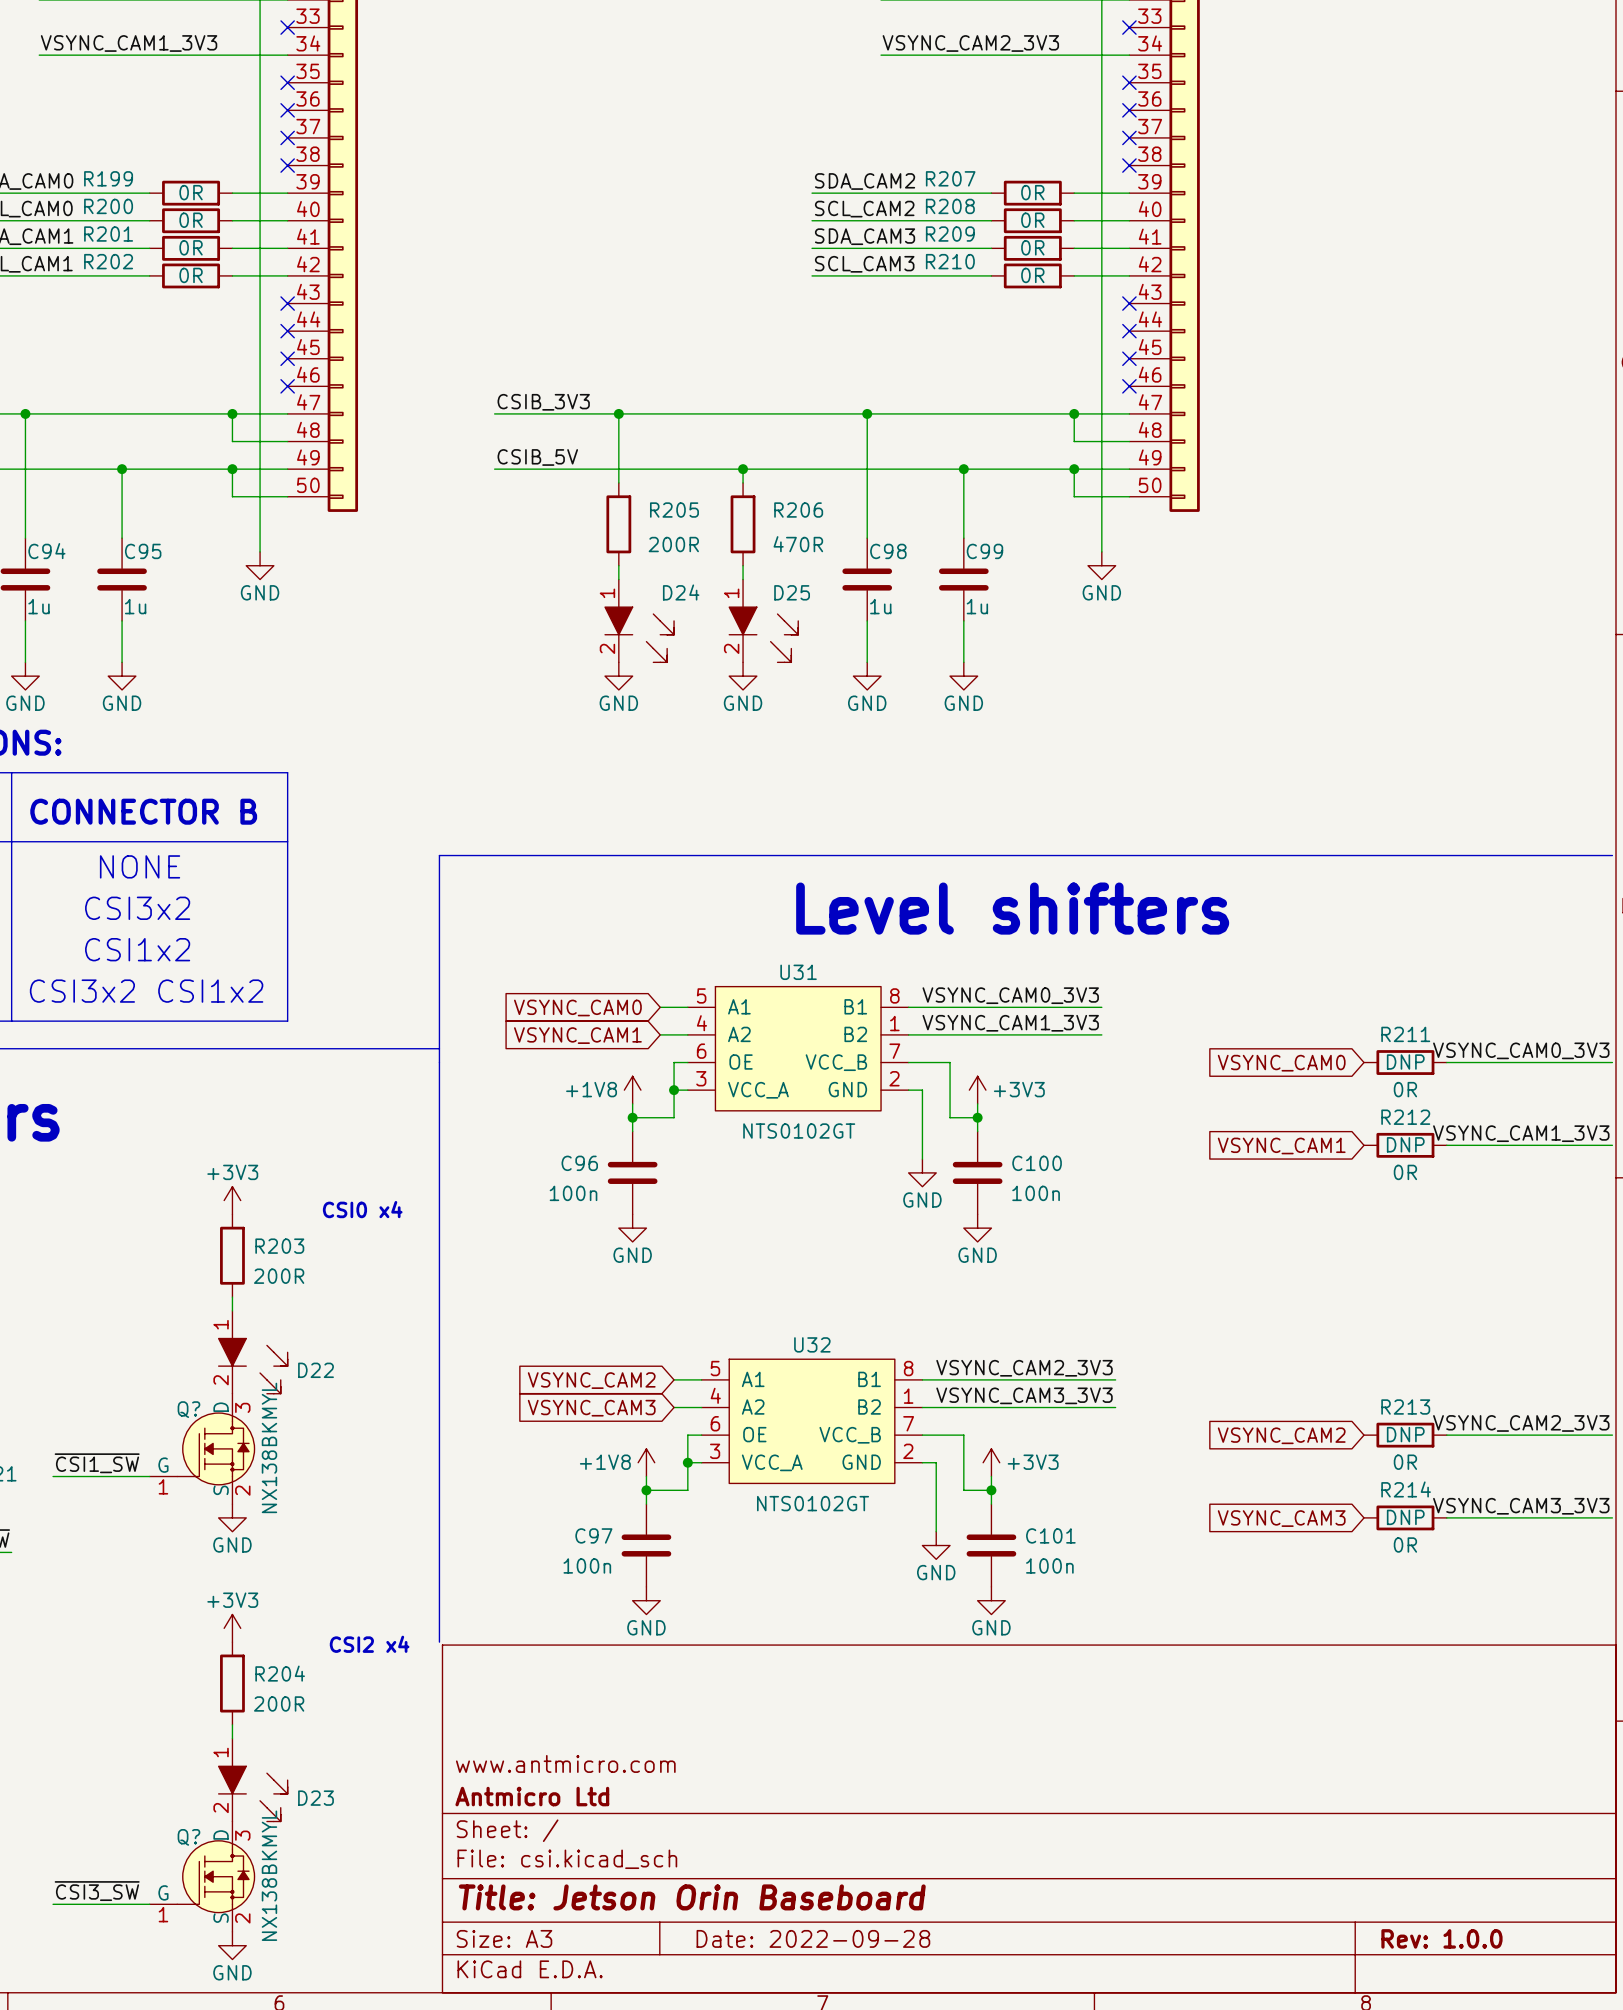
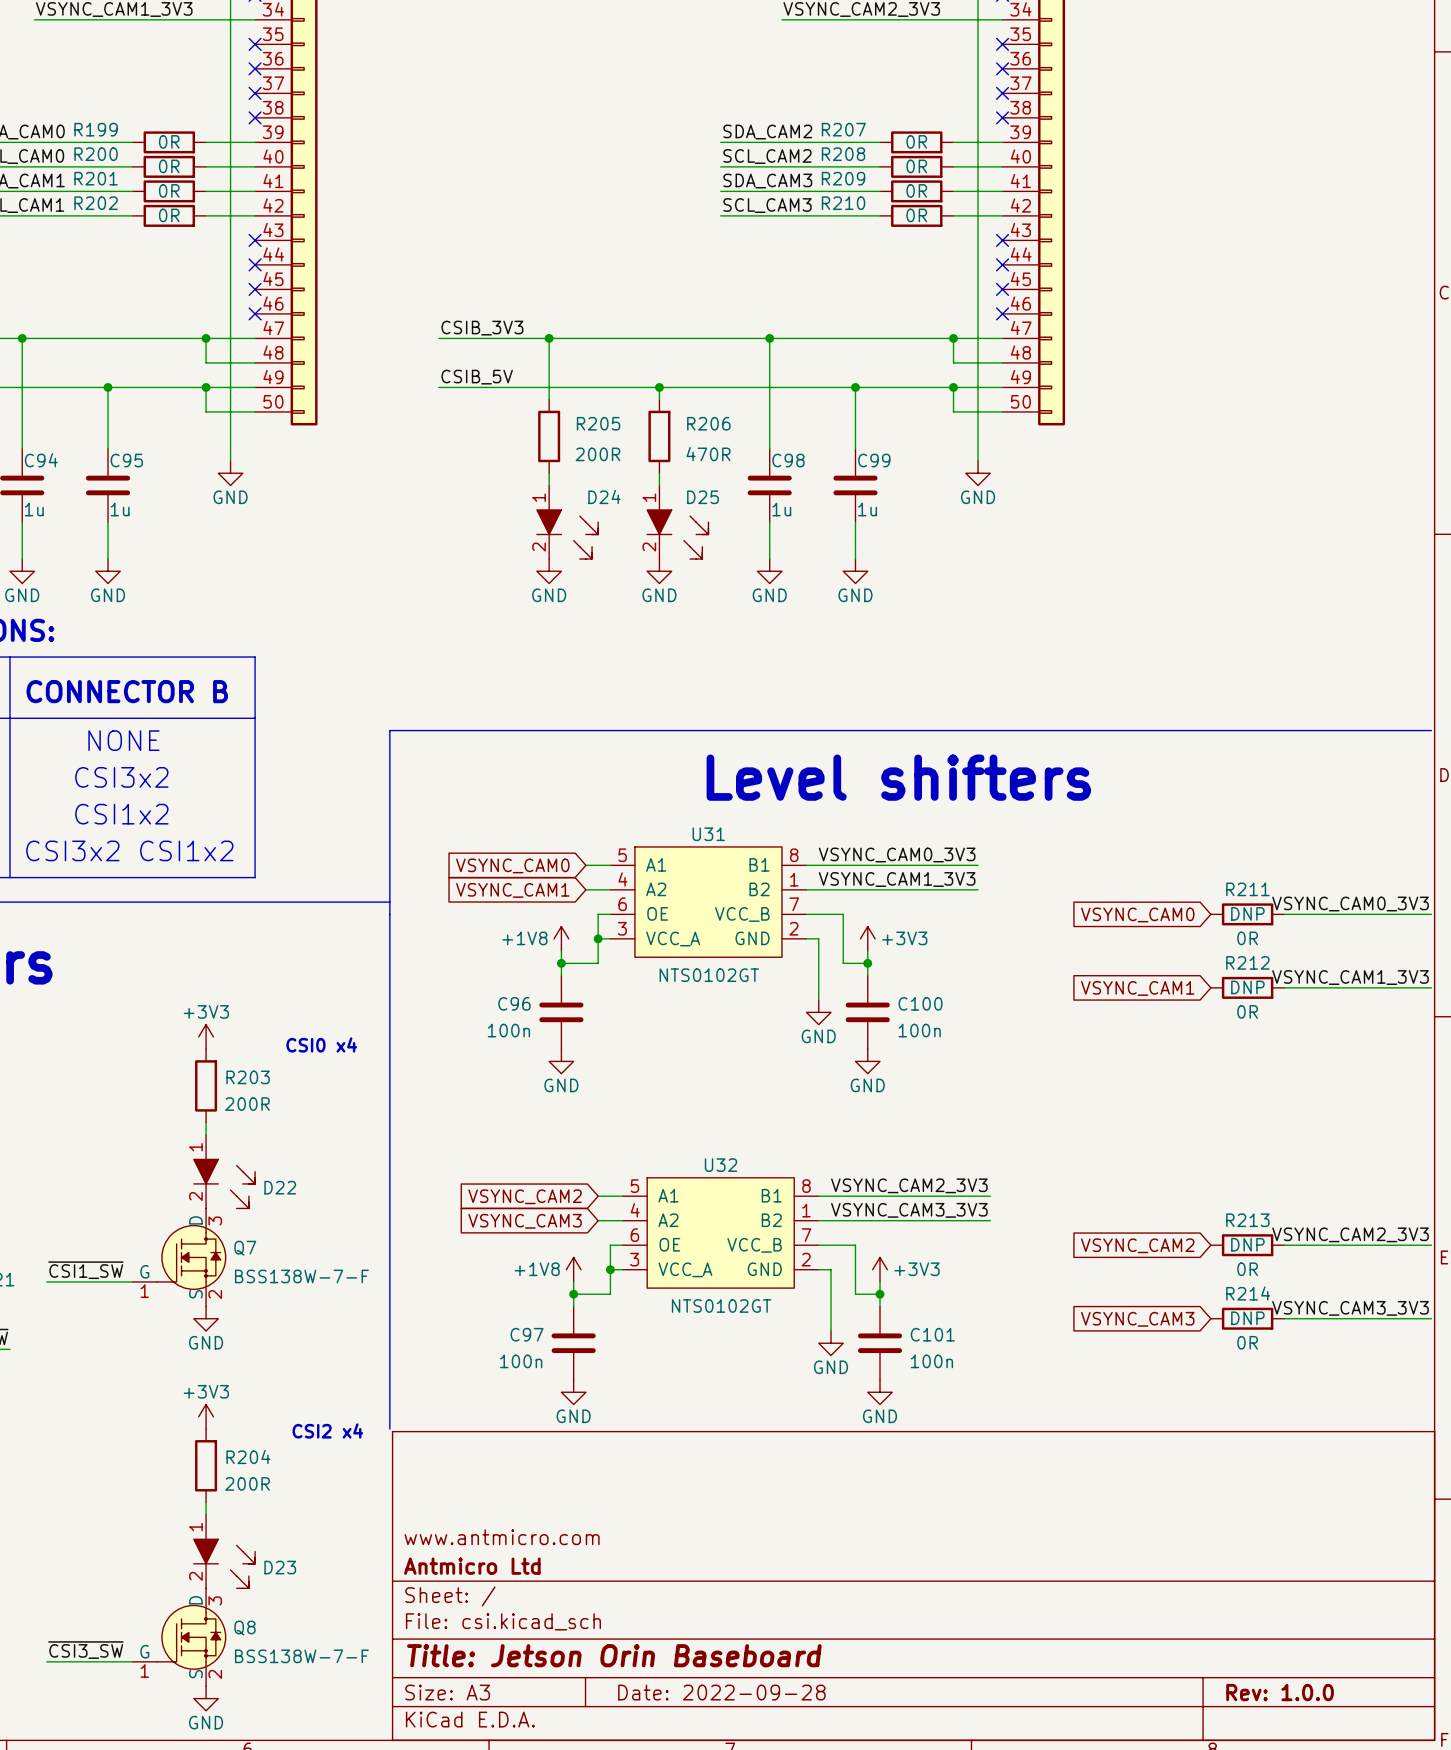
Q? name: Q? (188, 1409) -> Q7 (245, 1248)
Q? value: NX138BKMYL (269, 1447) -> BSS138W-7-F (301, 1276)
Q? name: Q? (188, 1837) -> Q8 (245, 1628)
Q? value: NX138BKMYL (269, 1875) -> BSS138W-7-F (301, 1656)

